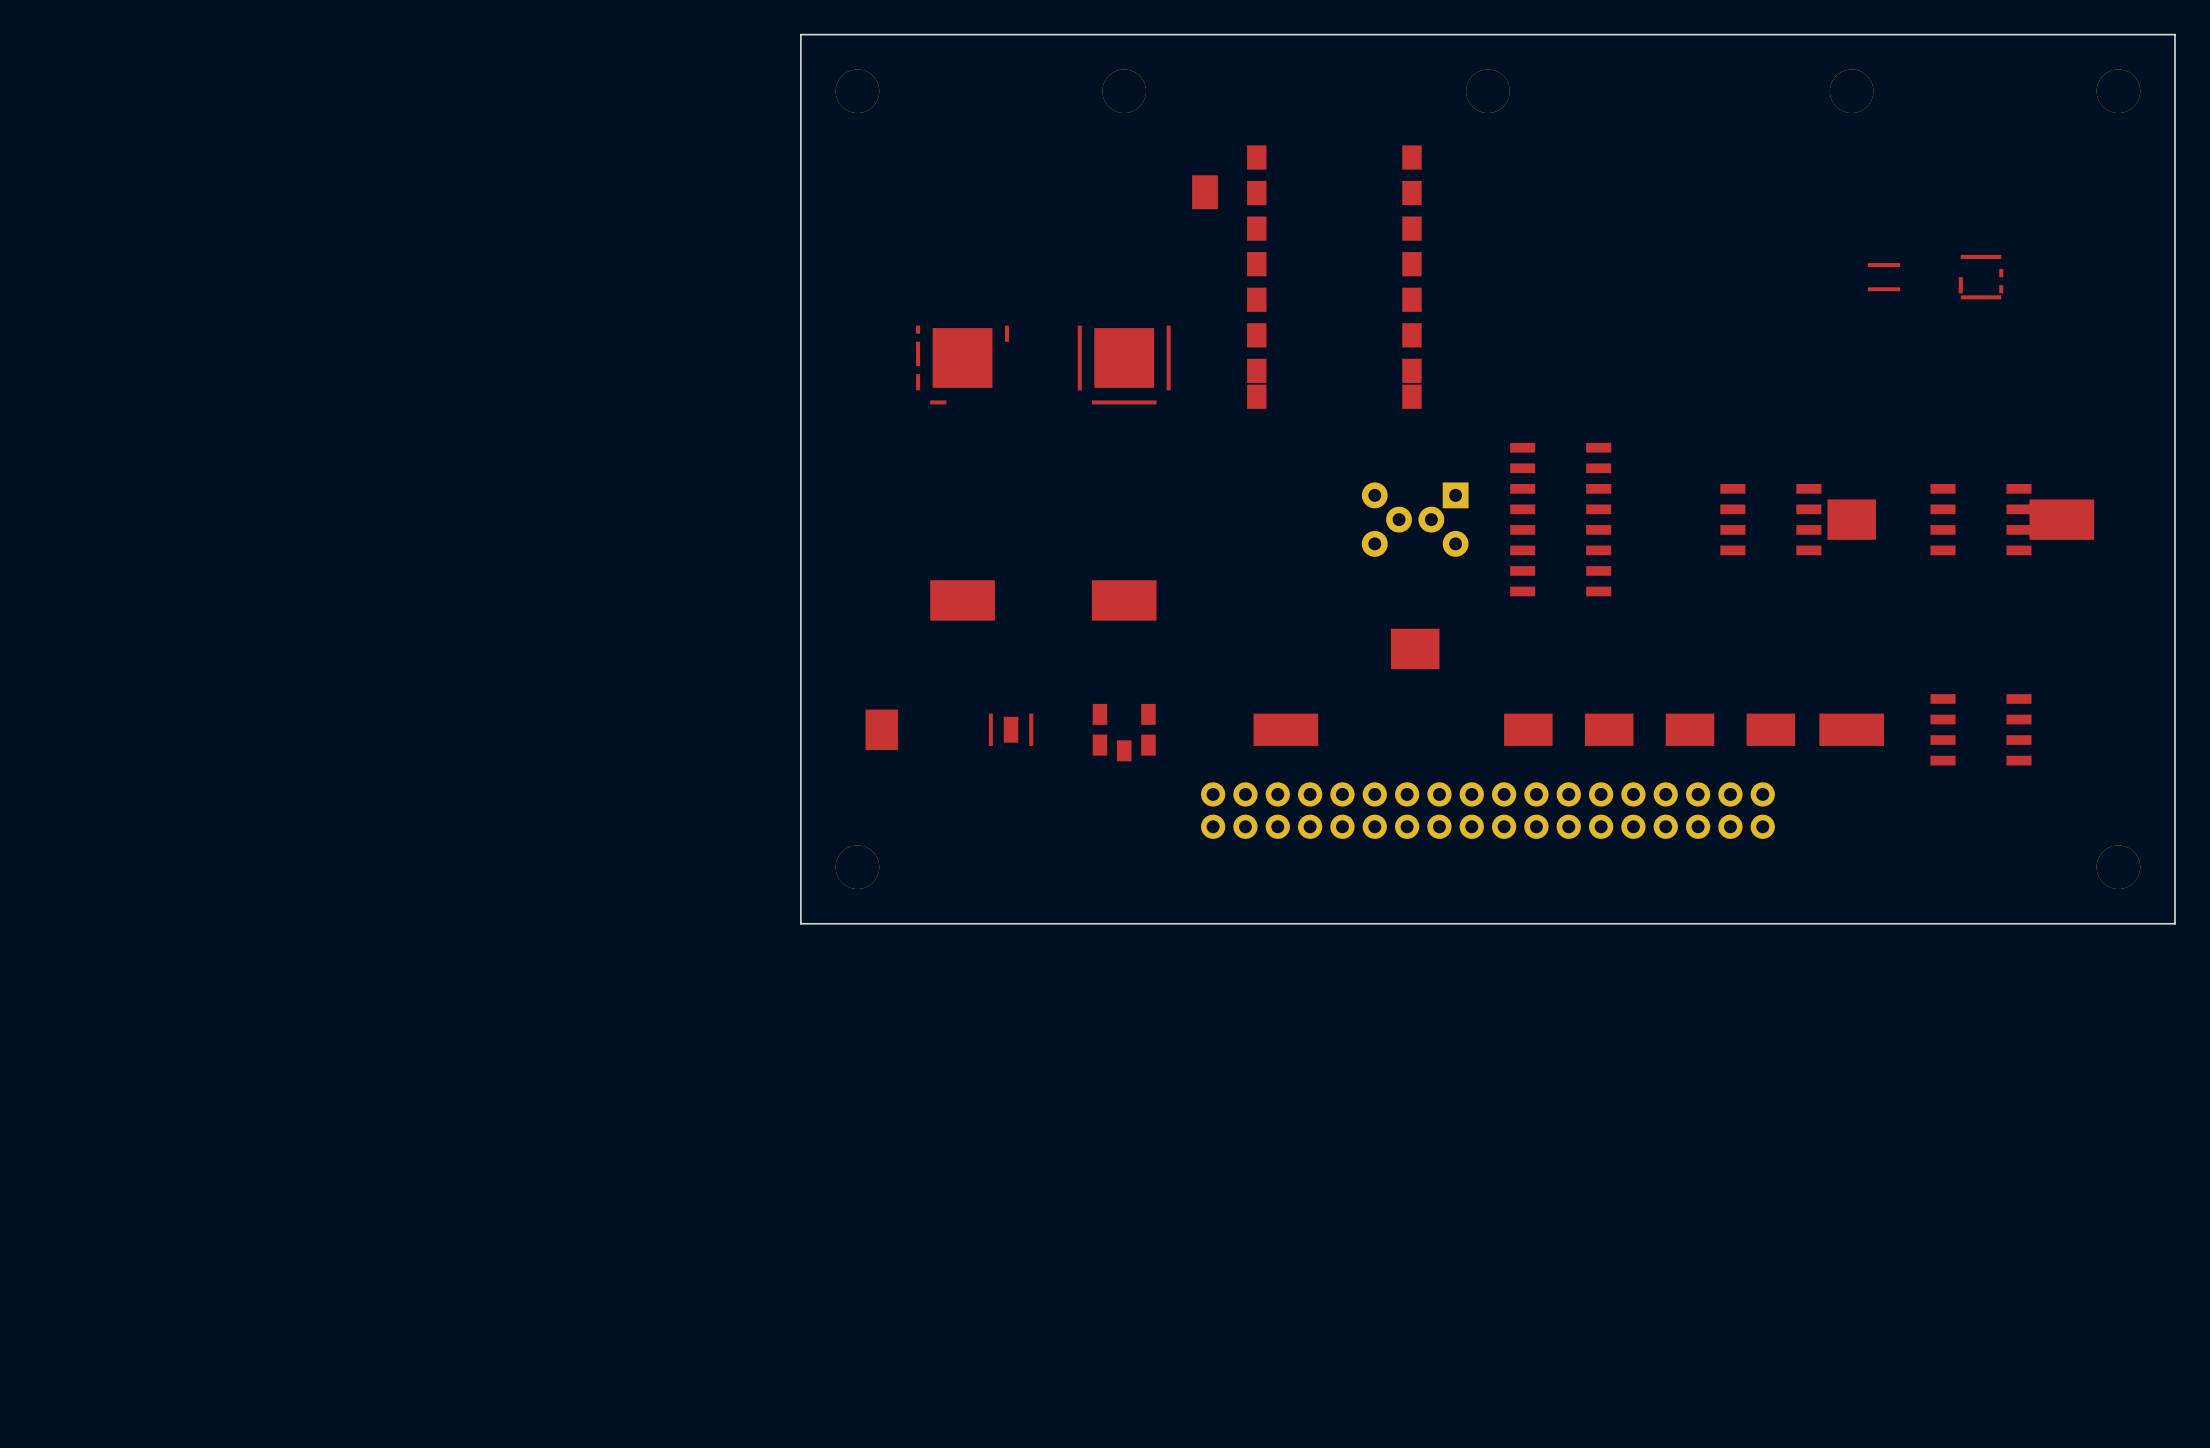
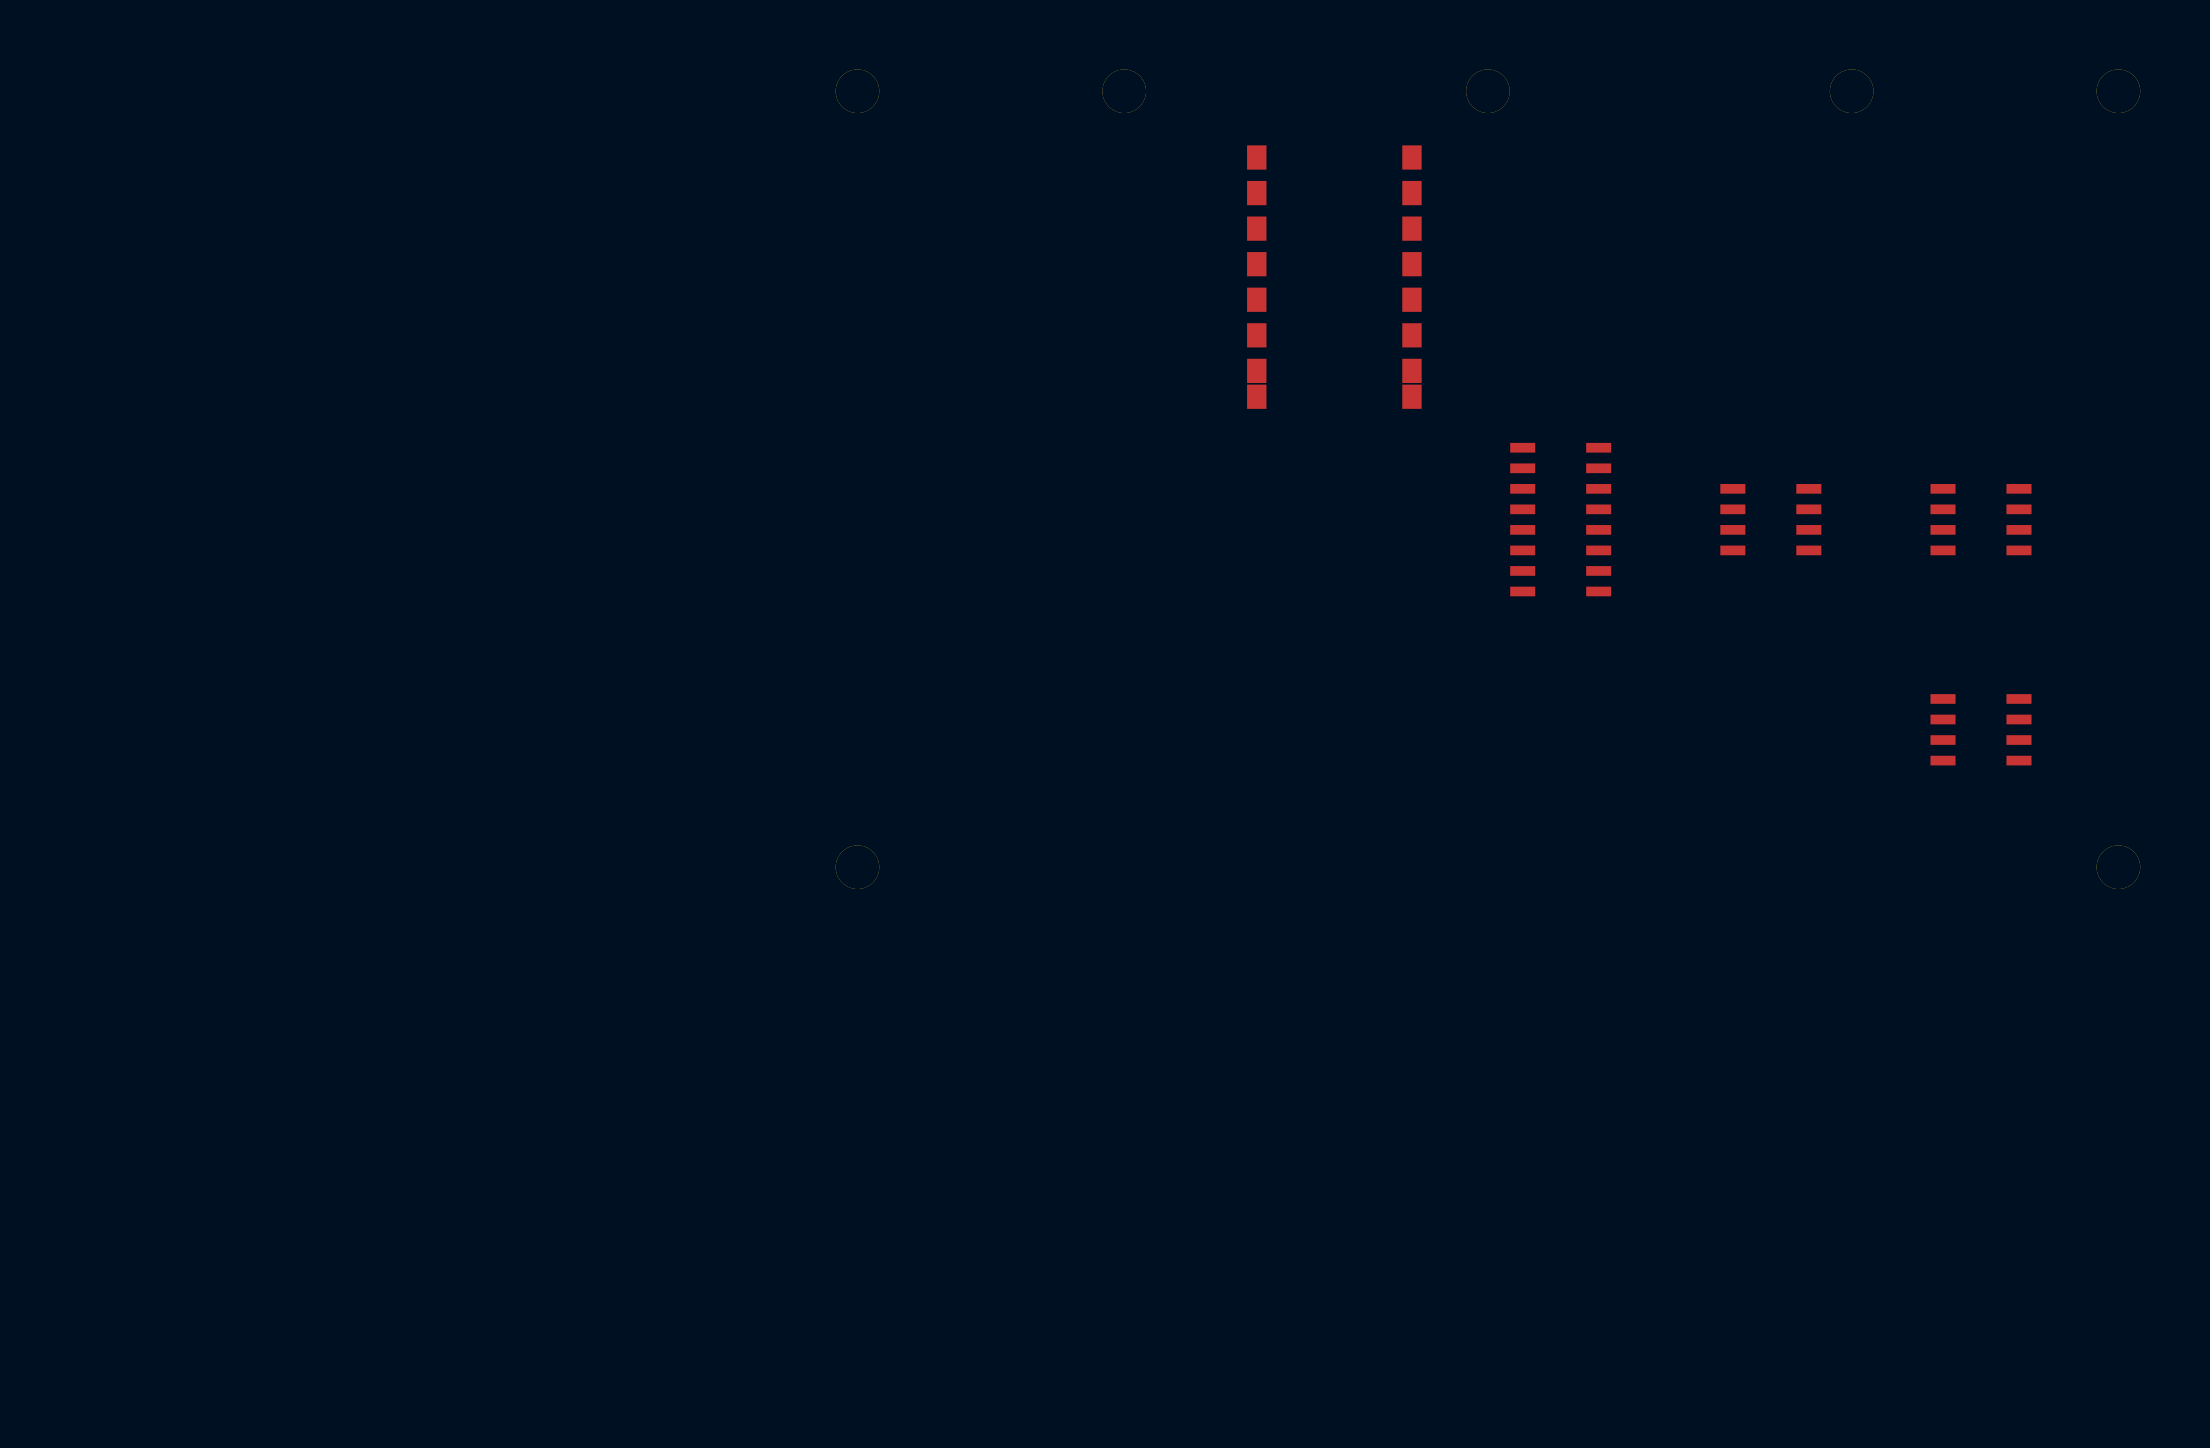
board edge: (2174, 34) (800, 34) (800, 923) (2174, 923) (2174, 34) -> none
part: (1205, 192) -> none
part: (1884, 277) -> none
part: (1981, 277) -> none
part: (962, 365) -> none
part: (1124, 365) -> none
part: (1415, 519) -> none
part: (1851, 519) -> none
part: (2061, 519) -> none
part: (962, 600) -> none
part: (1124, 600) -> none
part: (1415, 648) -> none
part: (881, 729) -> none
part: (1011, 729) -> none
part: (1285, 729) -> none
part: (1528, 729) -> none
part: (1609, 729) -> none
part: (1690, 729) -> none
part: (1770, 729) -> none
part: (1851, 729) -> none
part: (1124, 732) -> none
part: (1487, 810) -> none

